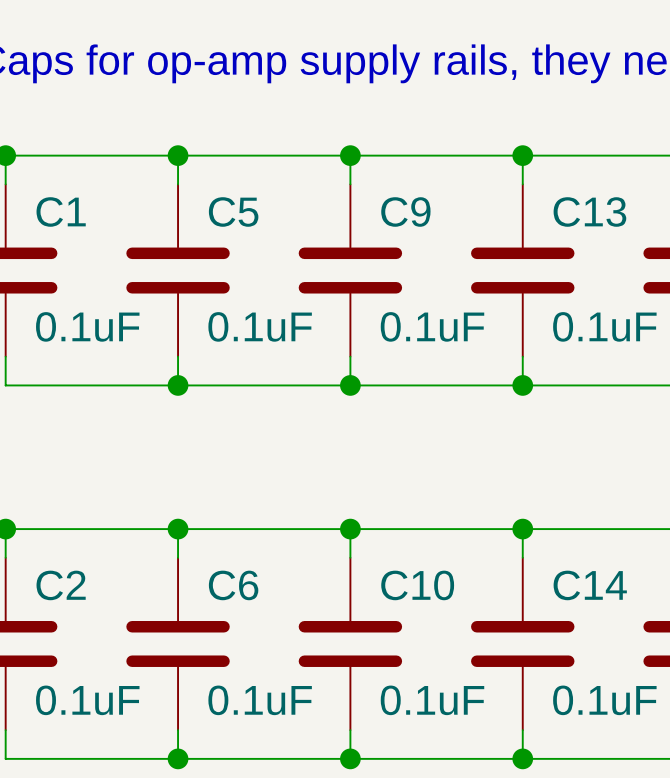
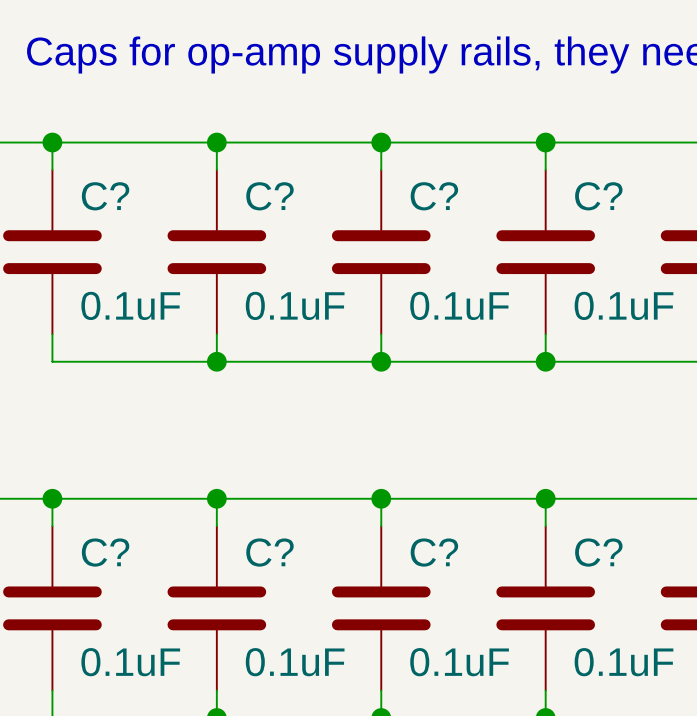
C1 name: C1 (61, 211) -> C? (105, 196)
C5 name: C5 (233, 211) -> C? (269, 196)
C9 name: C9 (405, 211) -> C? (434, 196)
C13 name: C13 (589, 211) -> C? (598, 196)
C2 name: C2 (61, 585) -> C? (105, 552)
C6 name: C6 (233, 585) -> C? (269, 552)
C10 name: C10 (417, 585) -> C? (434, 552)
C14 name: C14 (590, 585) -> C? (598, 552)

